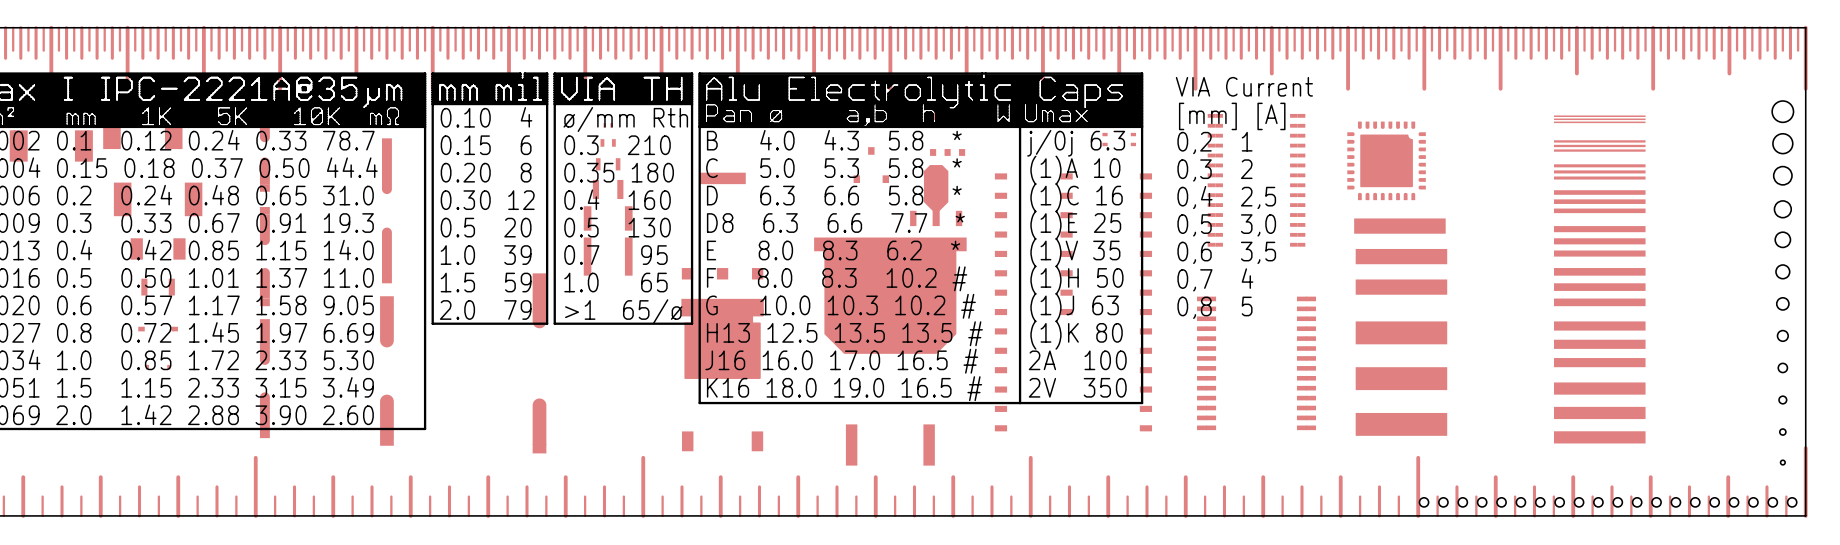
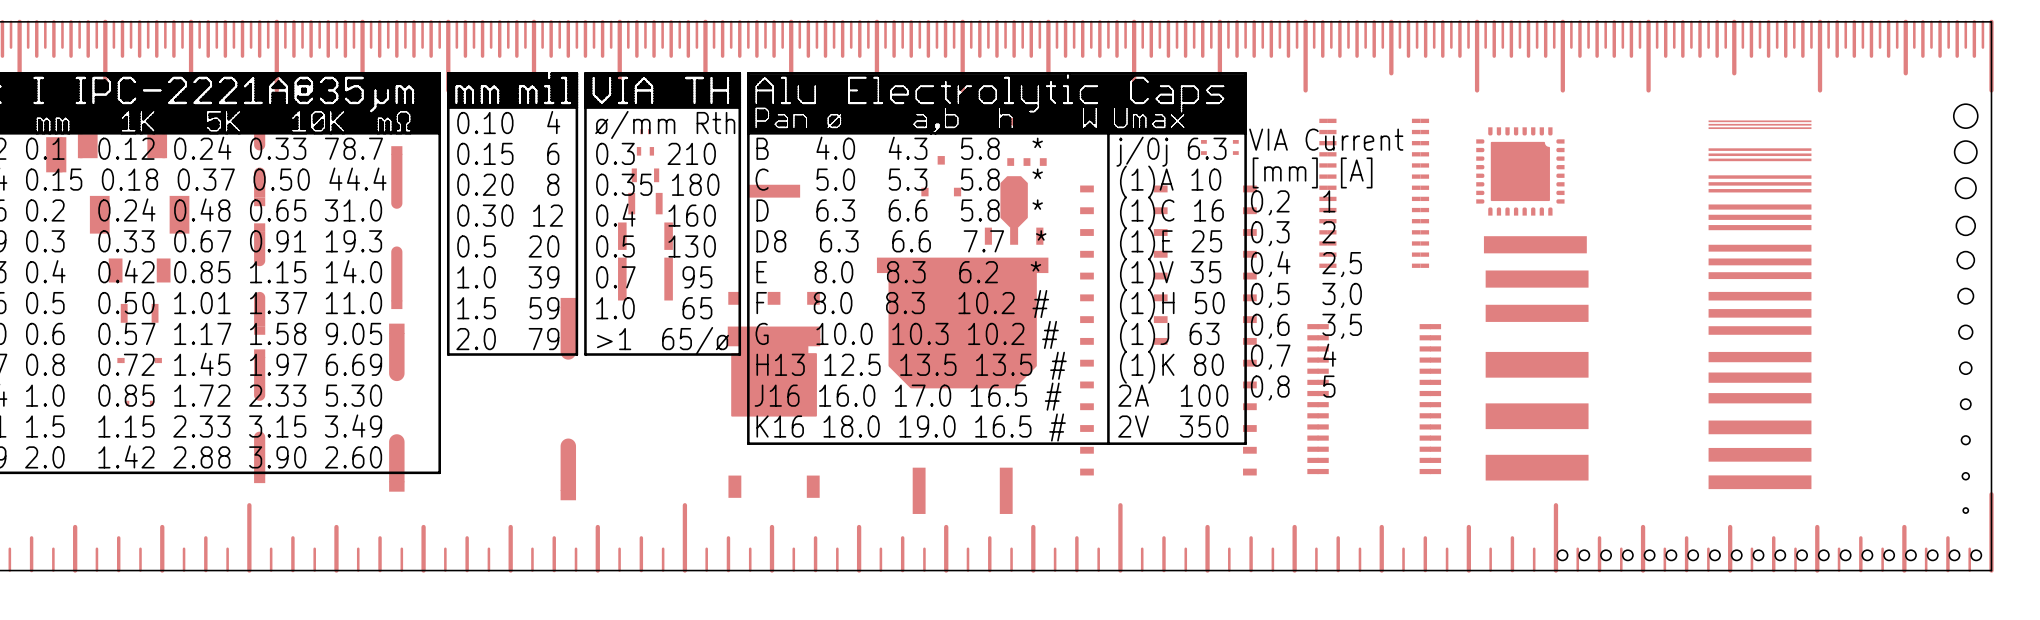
text position: VIA Current (1244, 86) -> VIA Current (1326, 139)
text position: [mm] [A] (1232, 116) -> [mm] [A] (1312, 172)
text position: 0,2 1 (1214, 143) -> 0,2 1 (1293, 202)
text position: 0,3 2 (1214, 170) -> 0,3 2 (1293, 233)
text position: 0,4 2,5 (1226, 197) -> 0,4 2,5 (1306, 264)
text position: 0,5 3,0 (1226, 225) -> 0,5 3,0 (1306, 295)
text position: 0,6 3,5 (1226, 252) -> 0,6 3,5 (1306, 326)
text position: 0,7 4 (1215, 279) -> 0,7 4 (1293, 356)
text position: 0,8 5 (1214, 307) -> 0,8 5 (1293, 388)

